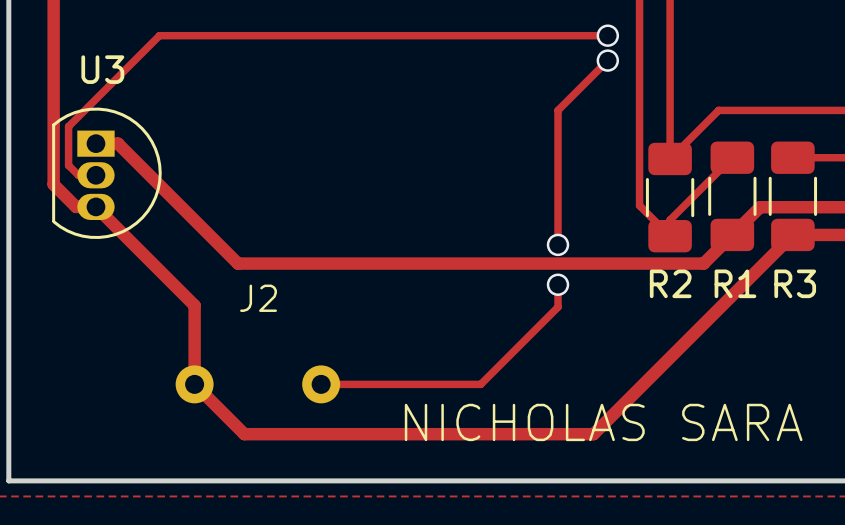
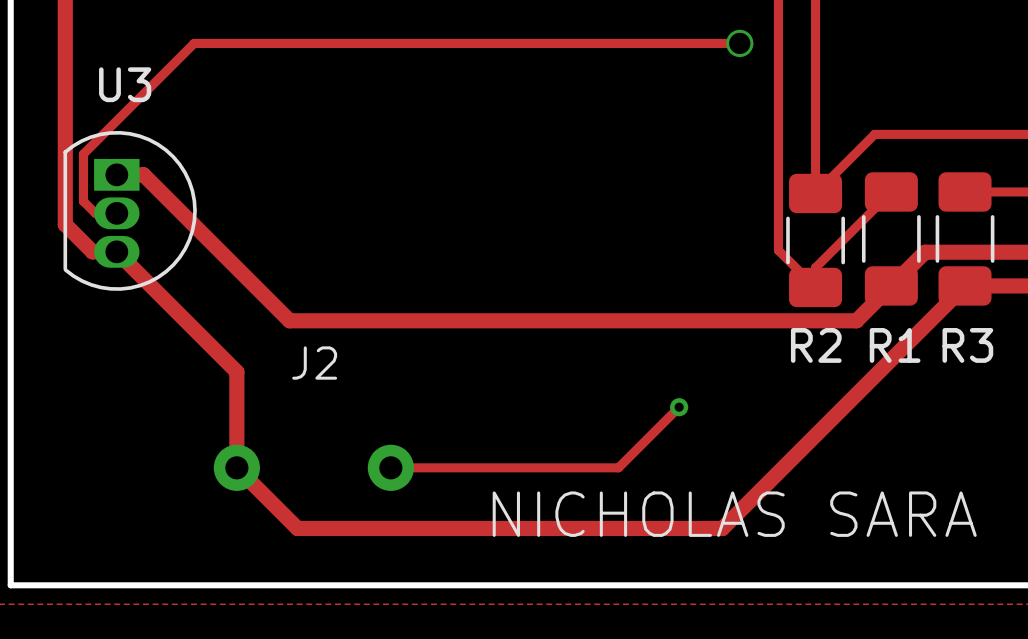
track: (607, 60) (558, 110) (558, 244) -> none
via: (607, 60) -> none
via: (558, 244) -> none
track: (558, 284) (558, 307) (480, 384) -> (679, 407) (618, 467) (585, 467)
via: (558, 284) -> none
via: none -> (679, 407)

